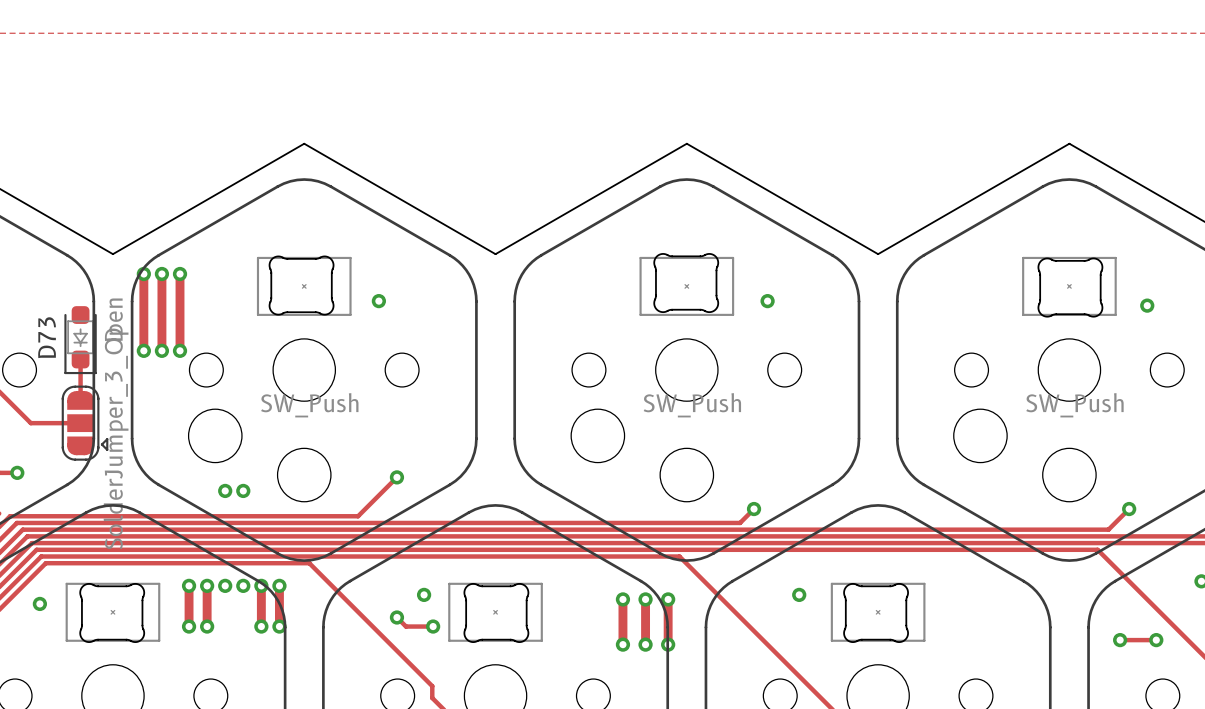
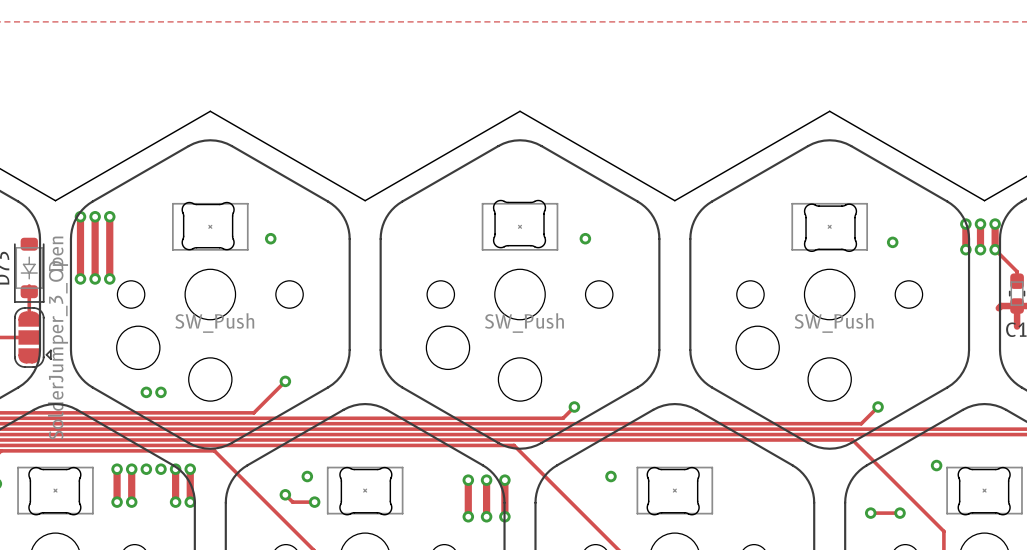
D73 footprint: [64, 306, 97, 375] -> [14, 237, 45, 303]

